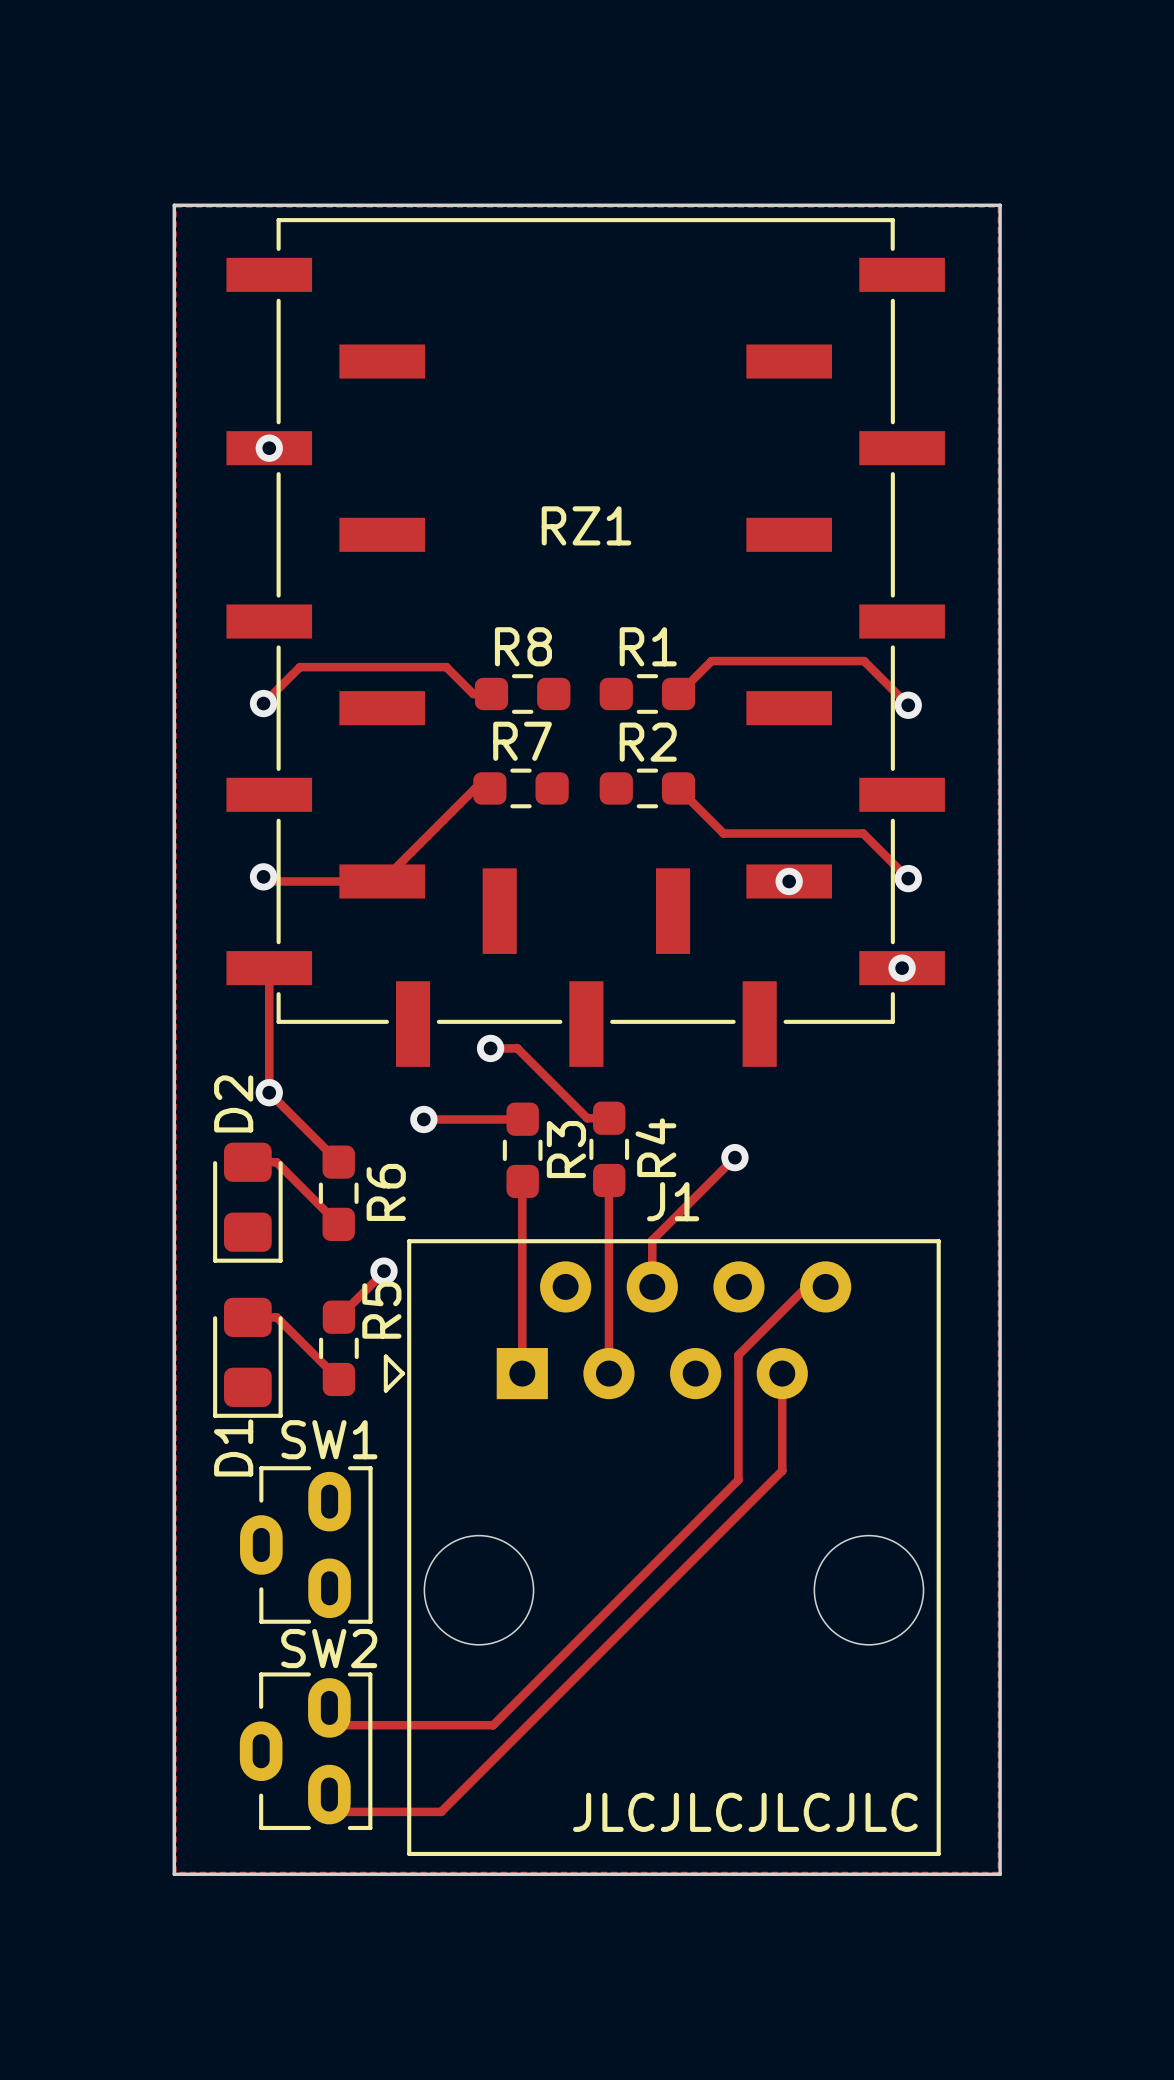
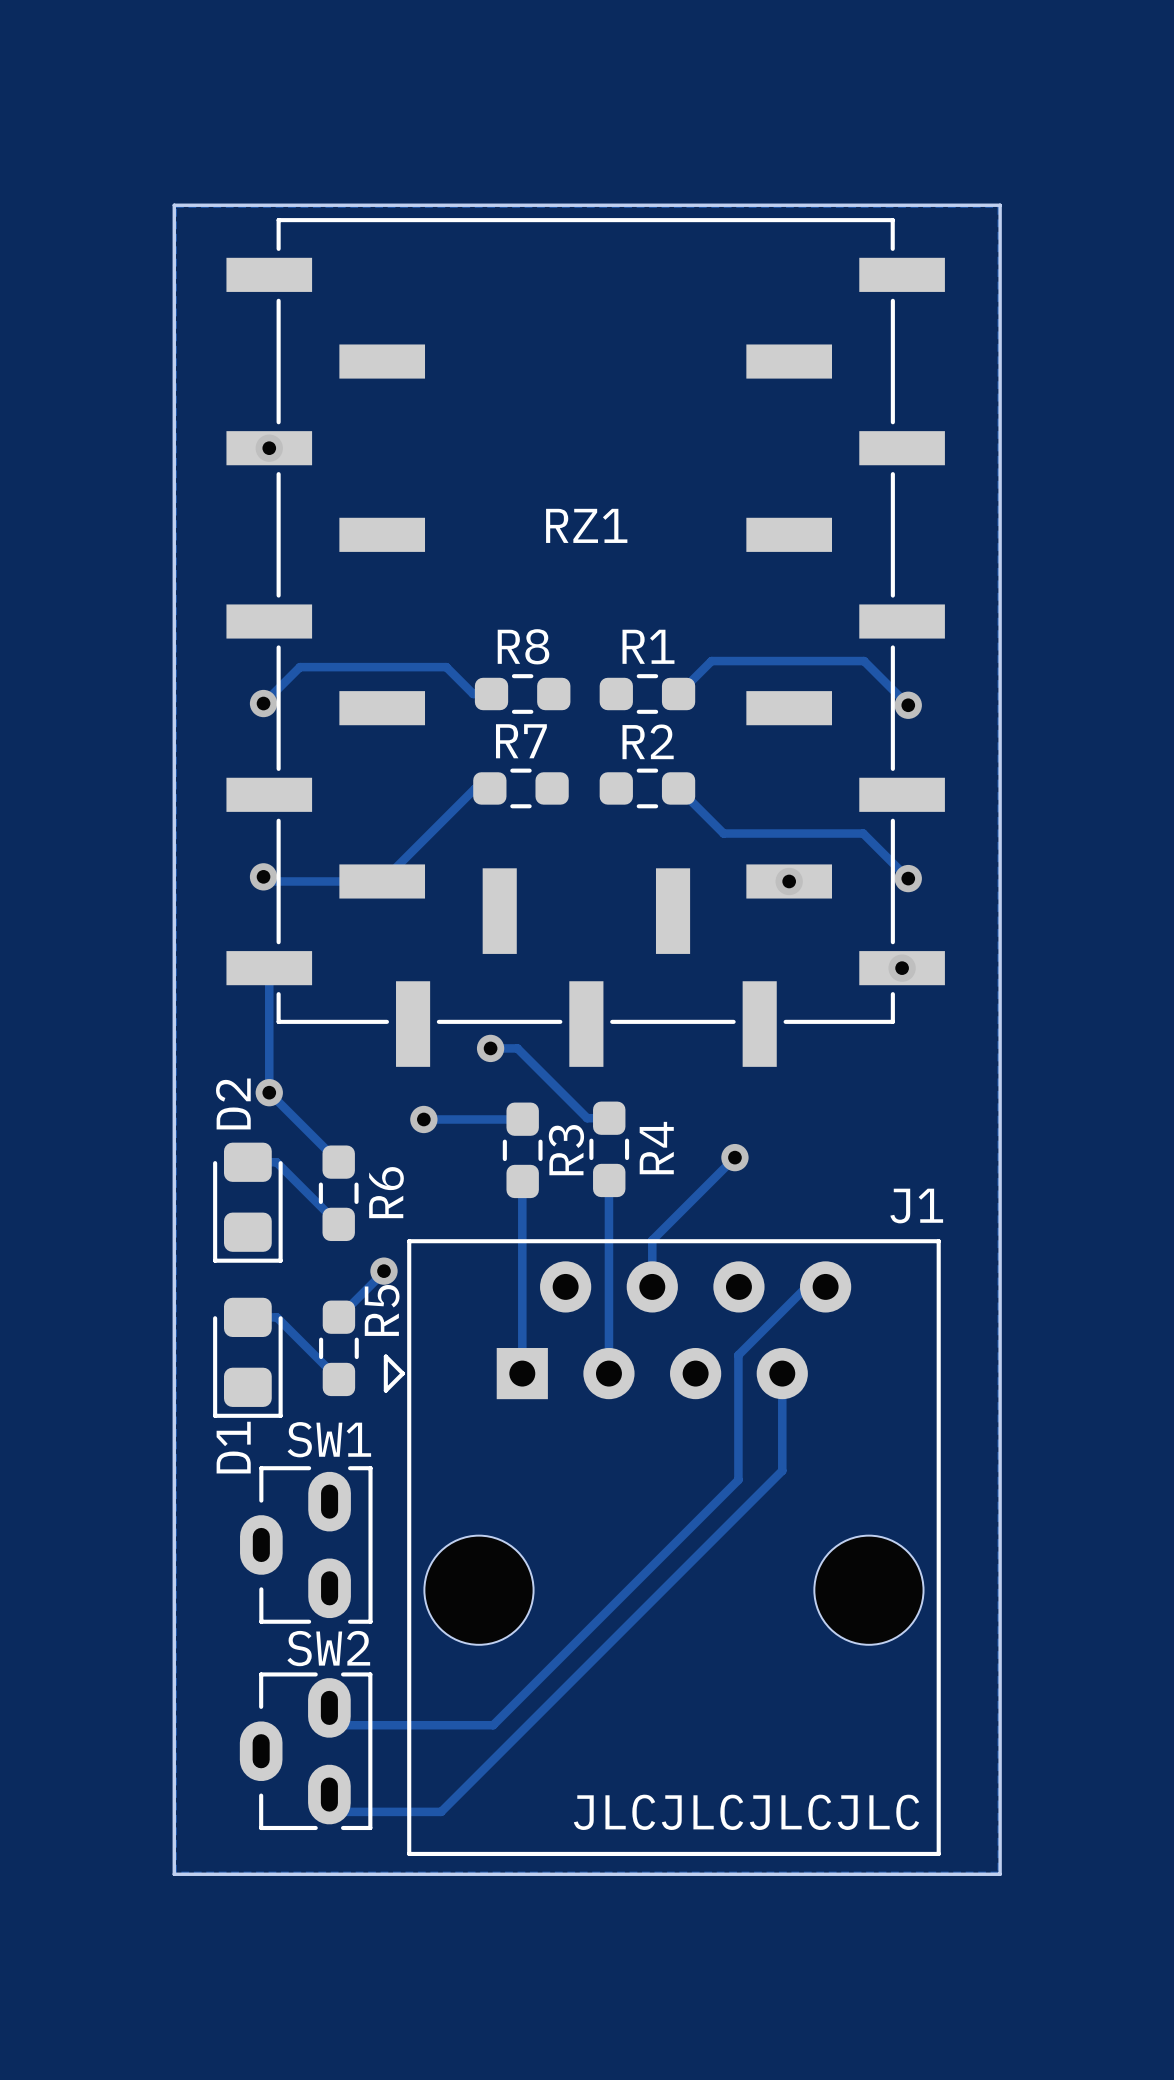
J1 name position: J1 (673, 1201) -> J1 (916, 1206)
SW2 footprint: [239, 1672, 373, 1831] -> [239, 1672, 373, 1831]

